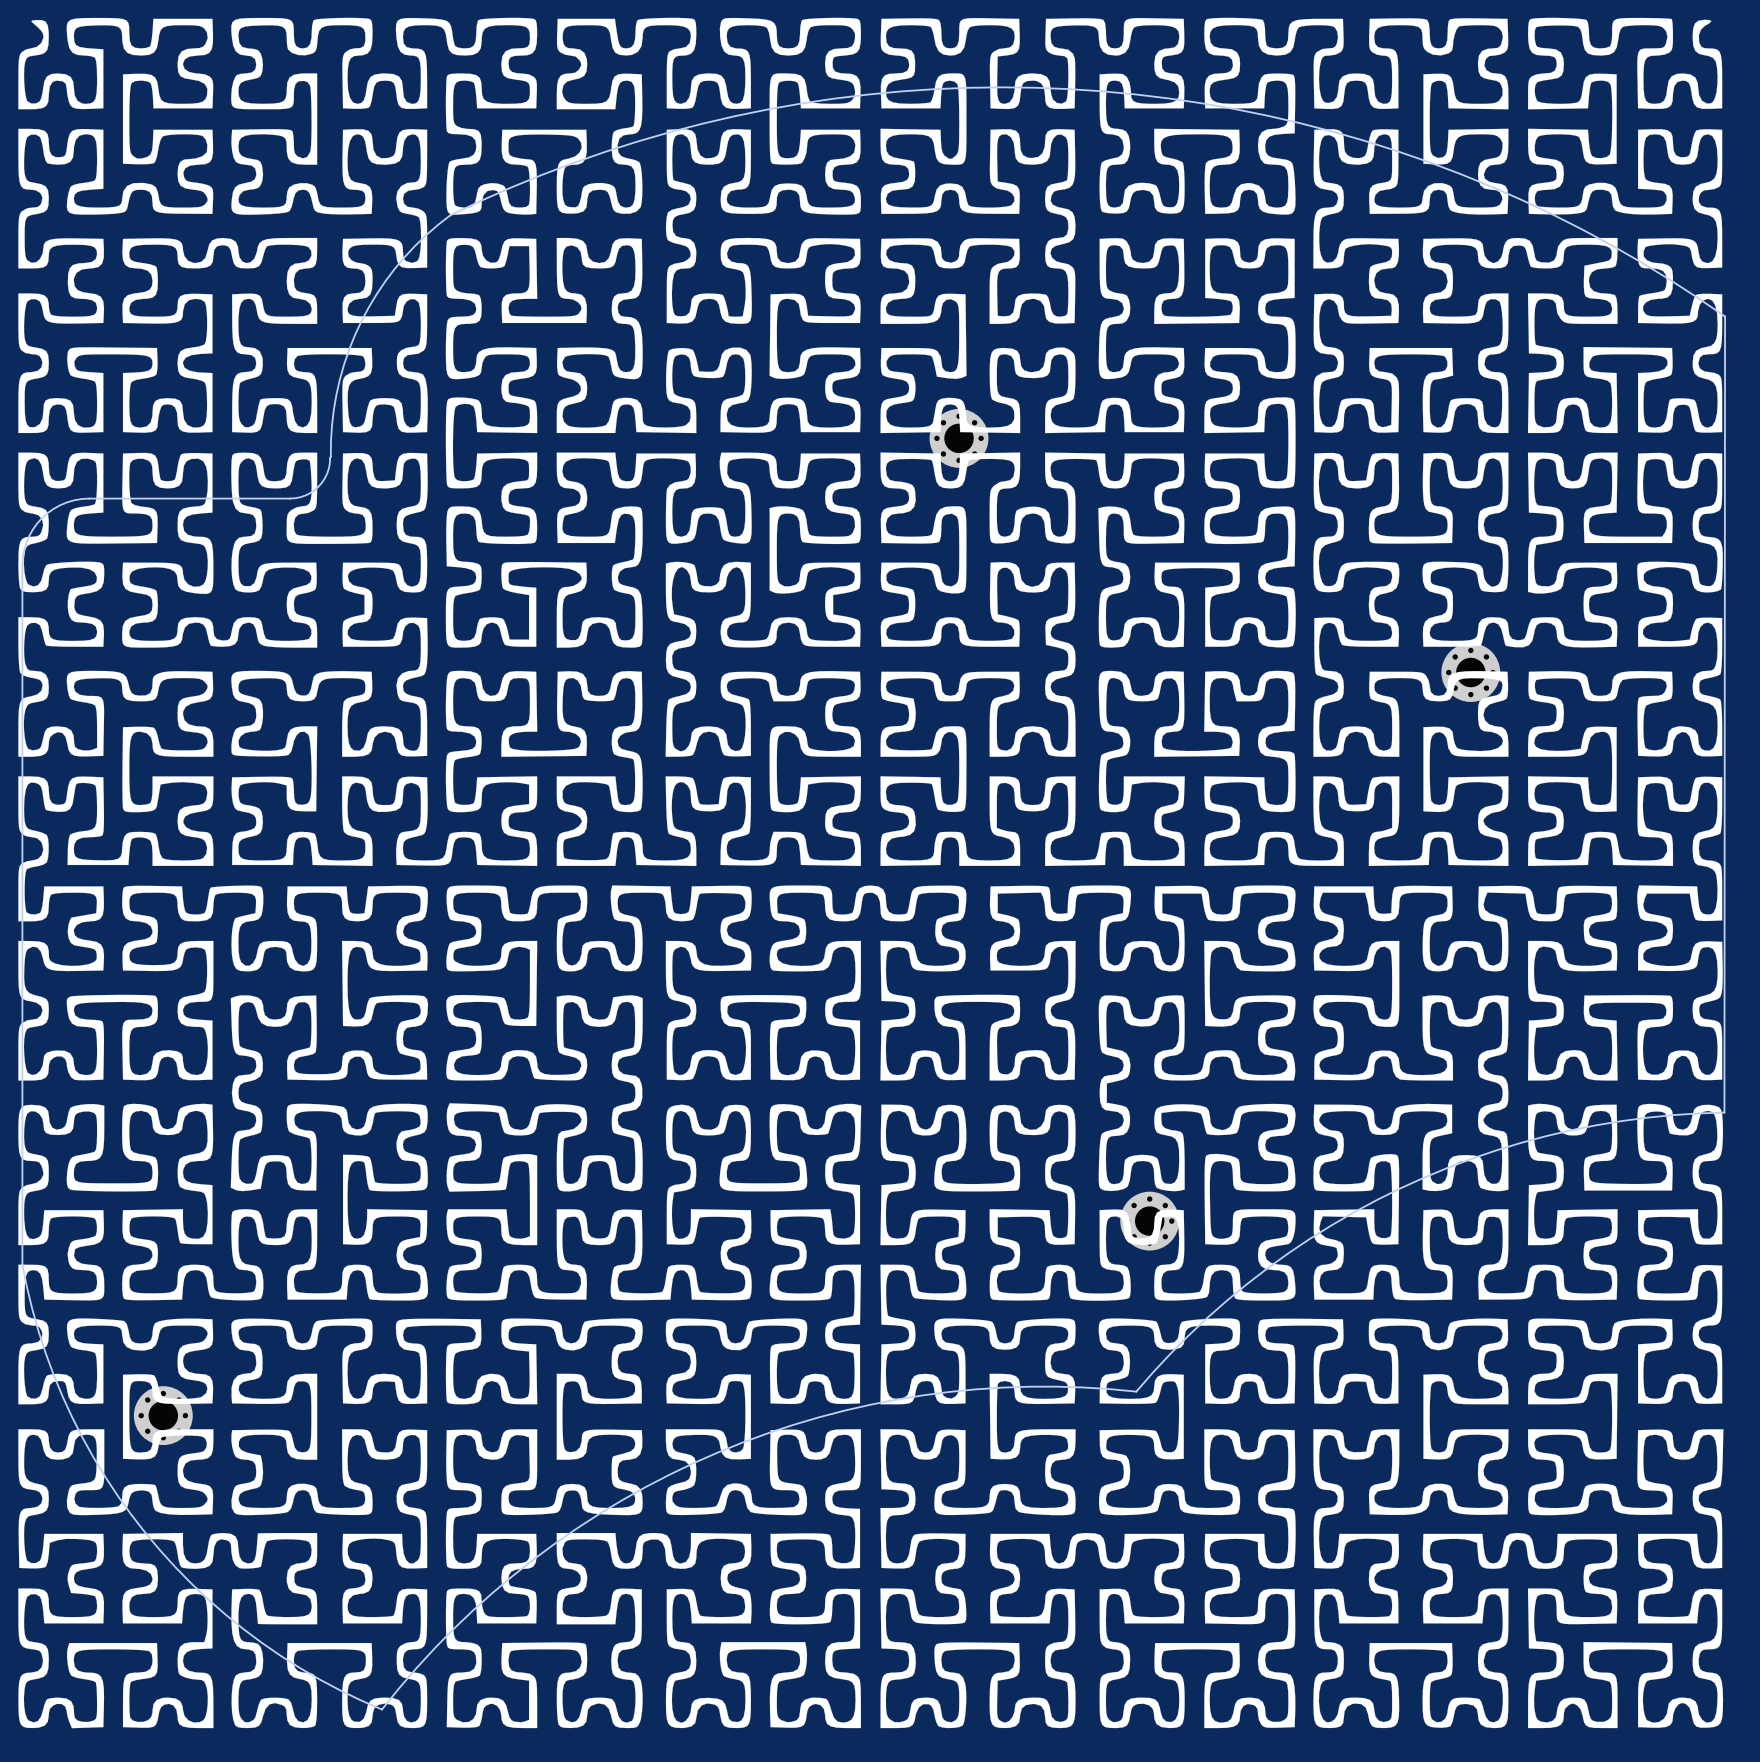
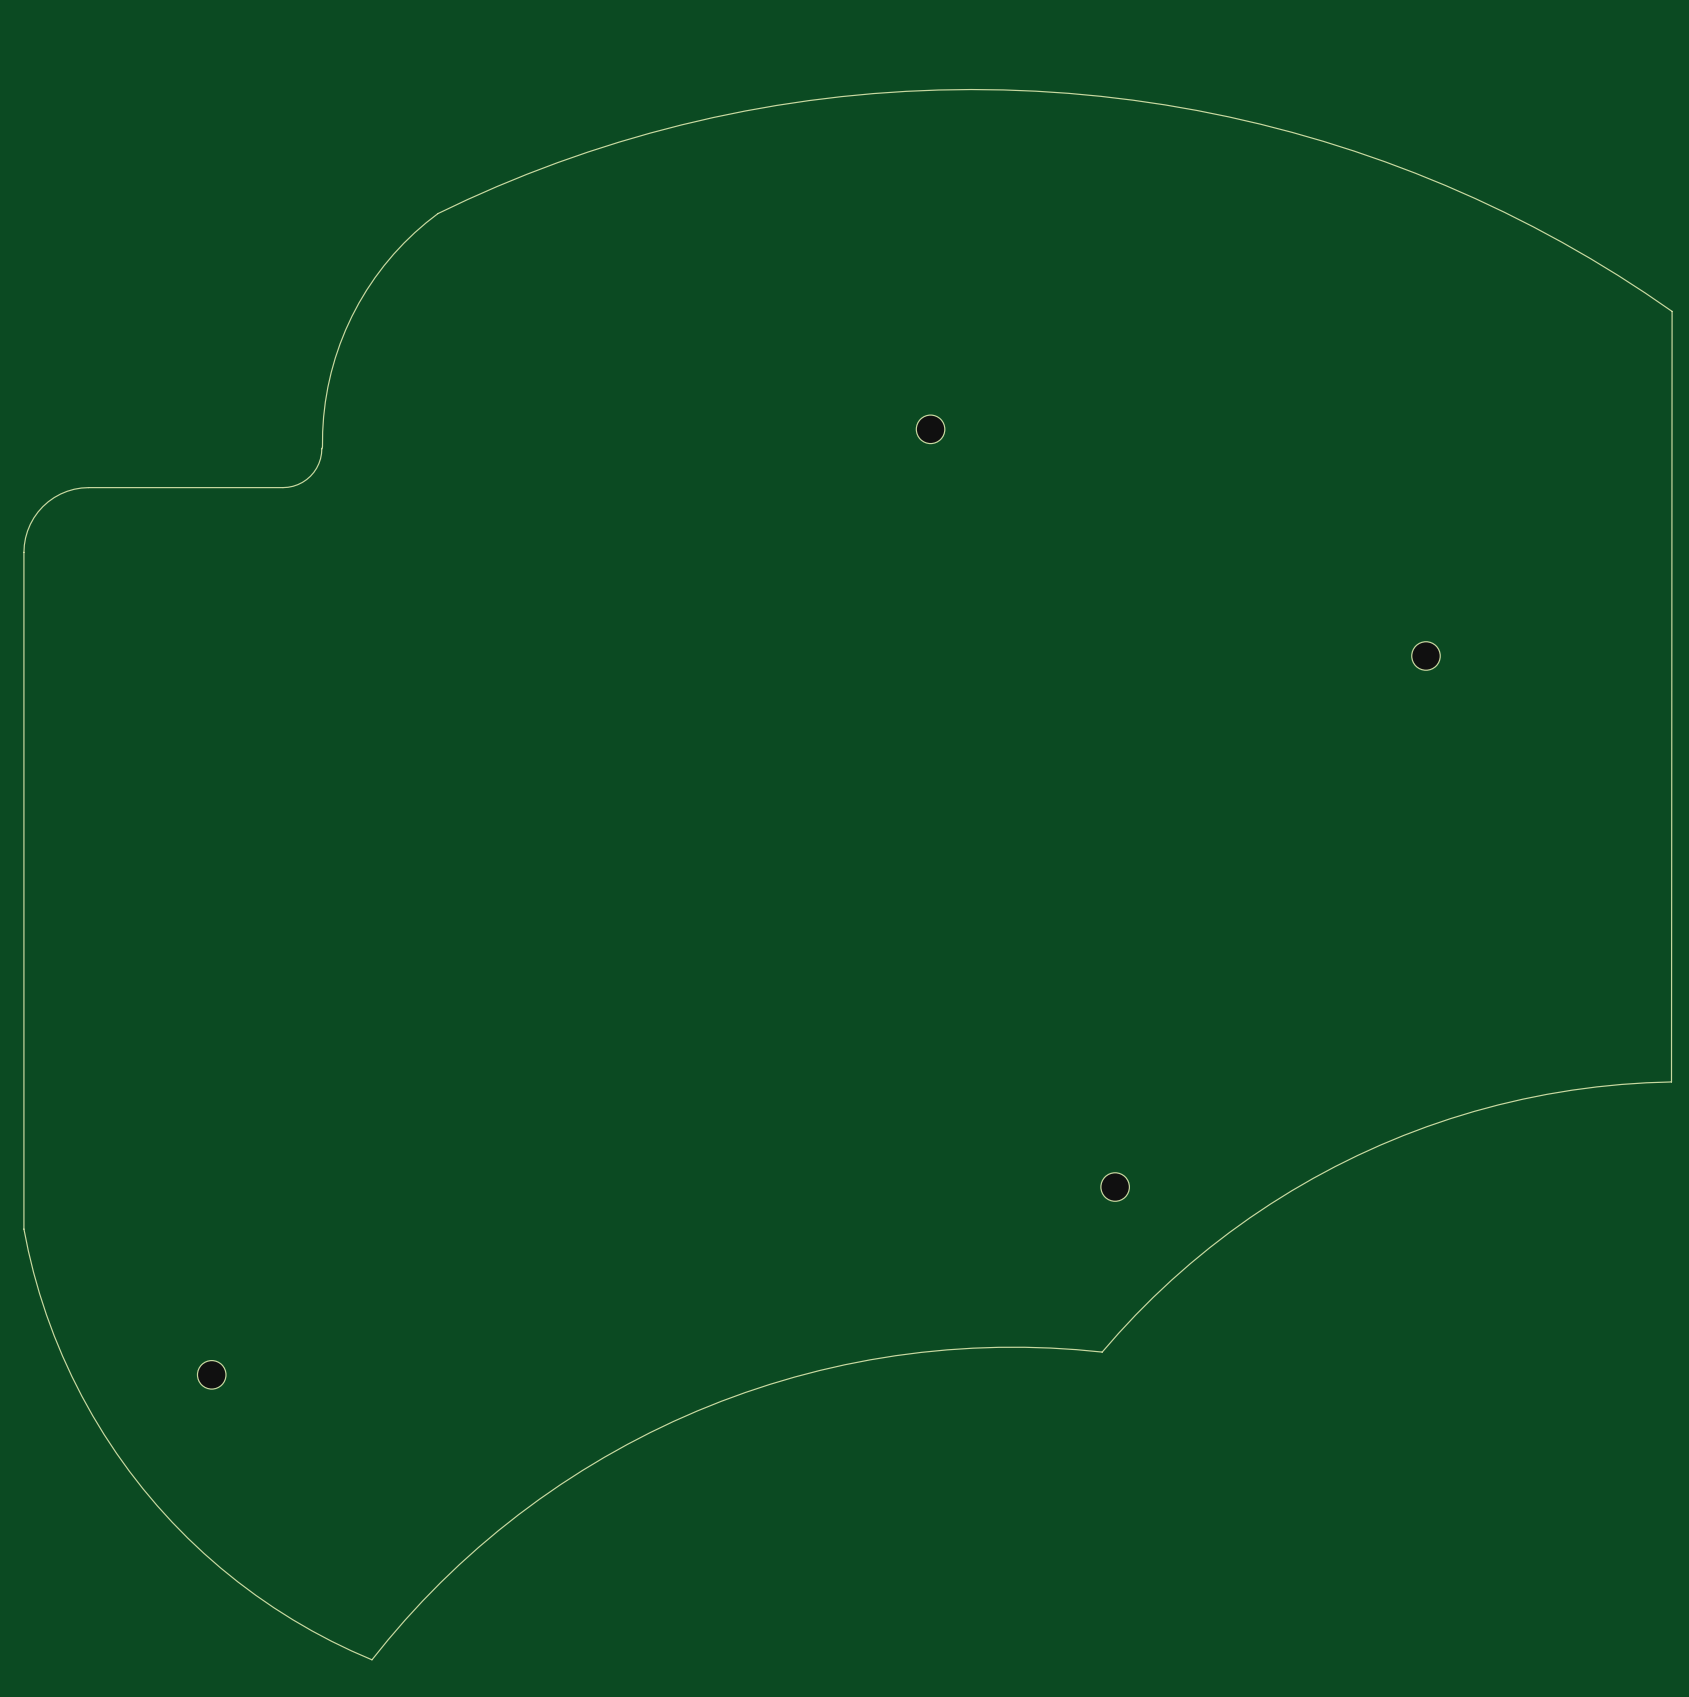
drawing: [18, 17, 1724, 1729] -> none
part footprint: [929, 408, 989, 468] -> [916, 415, 945, 444]
part footprint: [1441, 643, 1501, 702] -> [1411, 641, 1441, 671]
part footprint: [1120, 1191, 1180, 1251] -> [1100, 1172, 1130, 1202]
part: (163, 1415) -> none
part: none -> (211, 1374)

